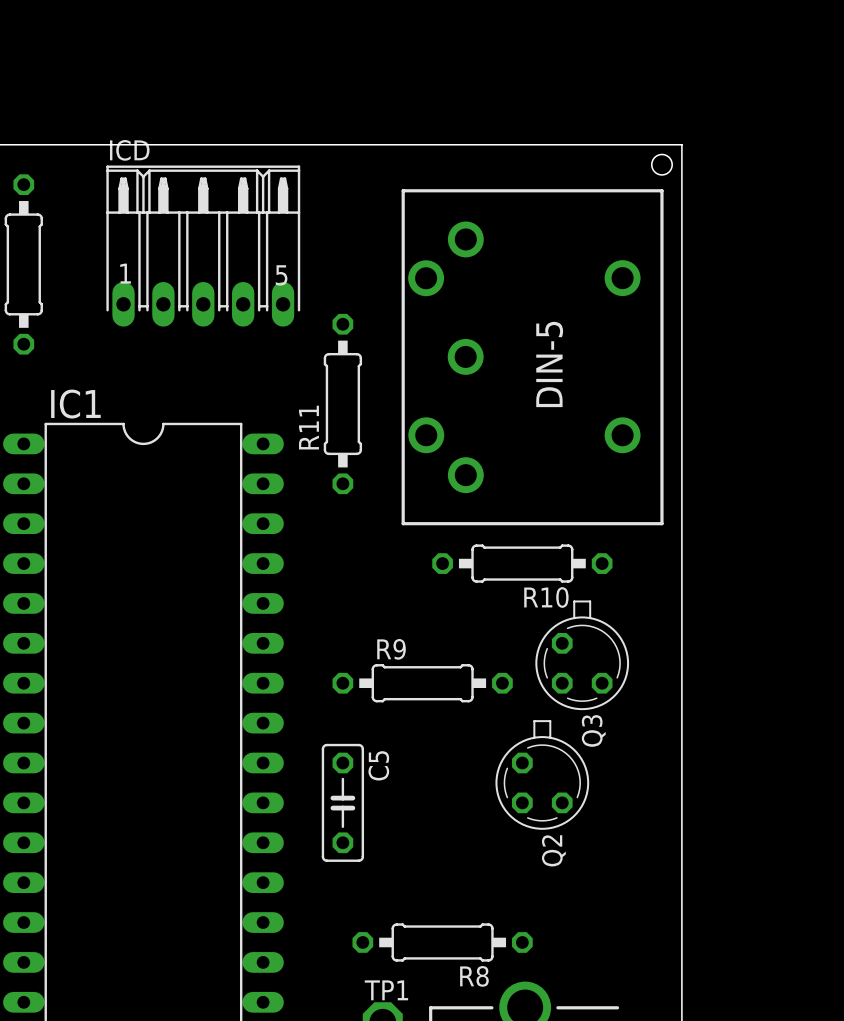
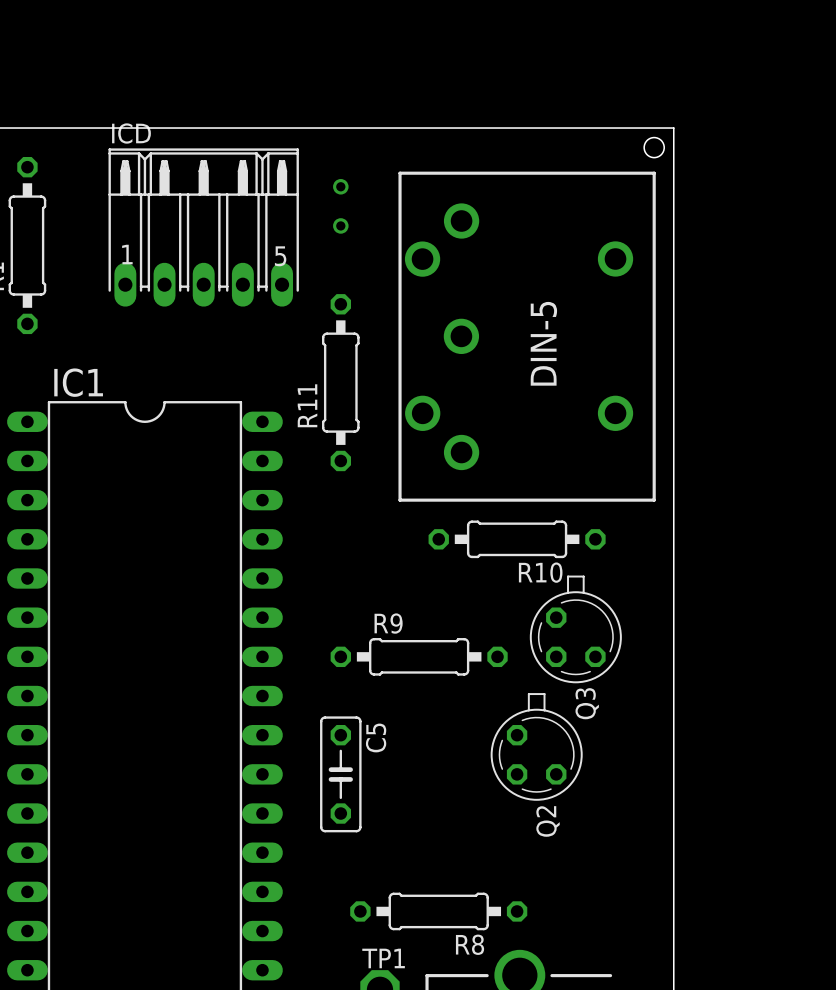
via: none -> (340, 186)
via: none -> (340, 225)

